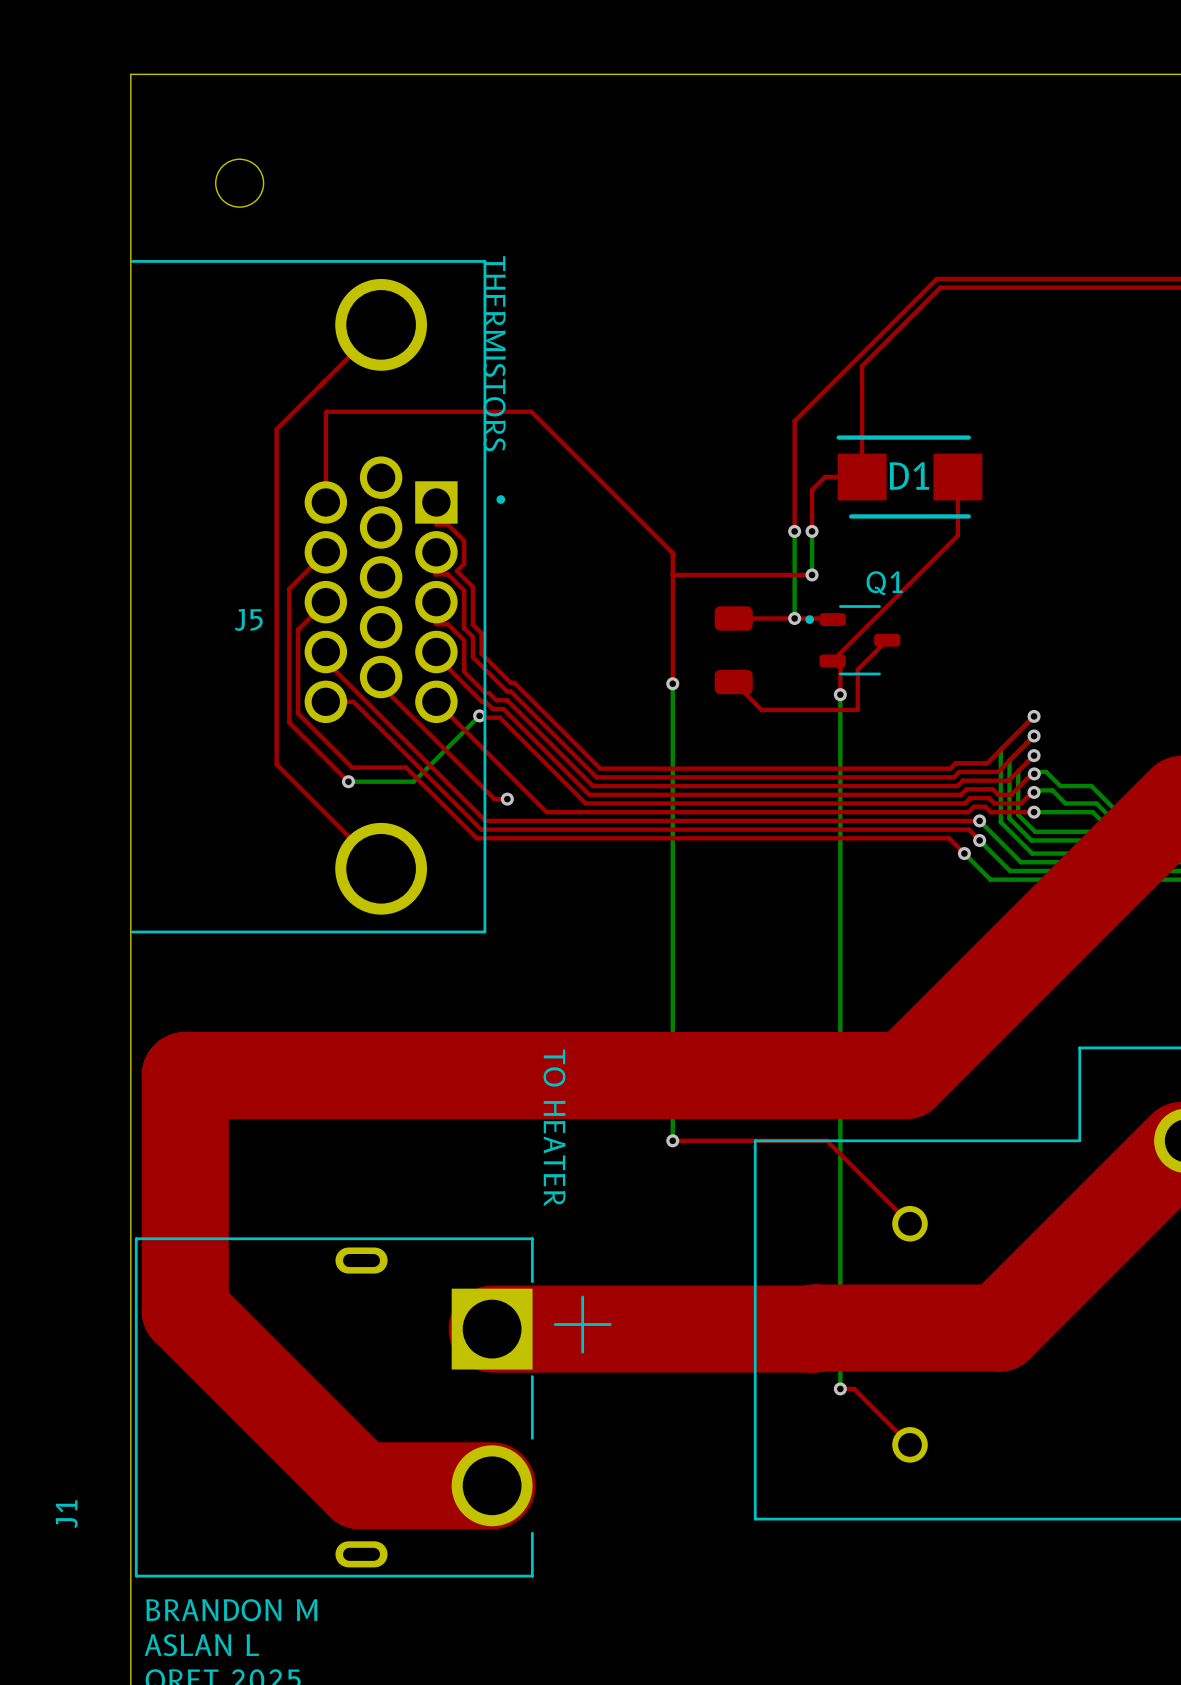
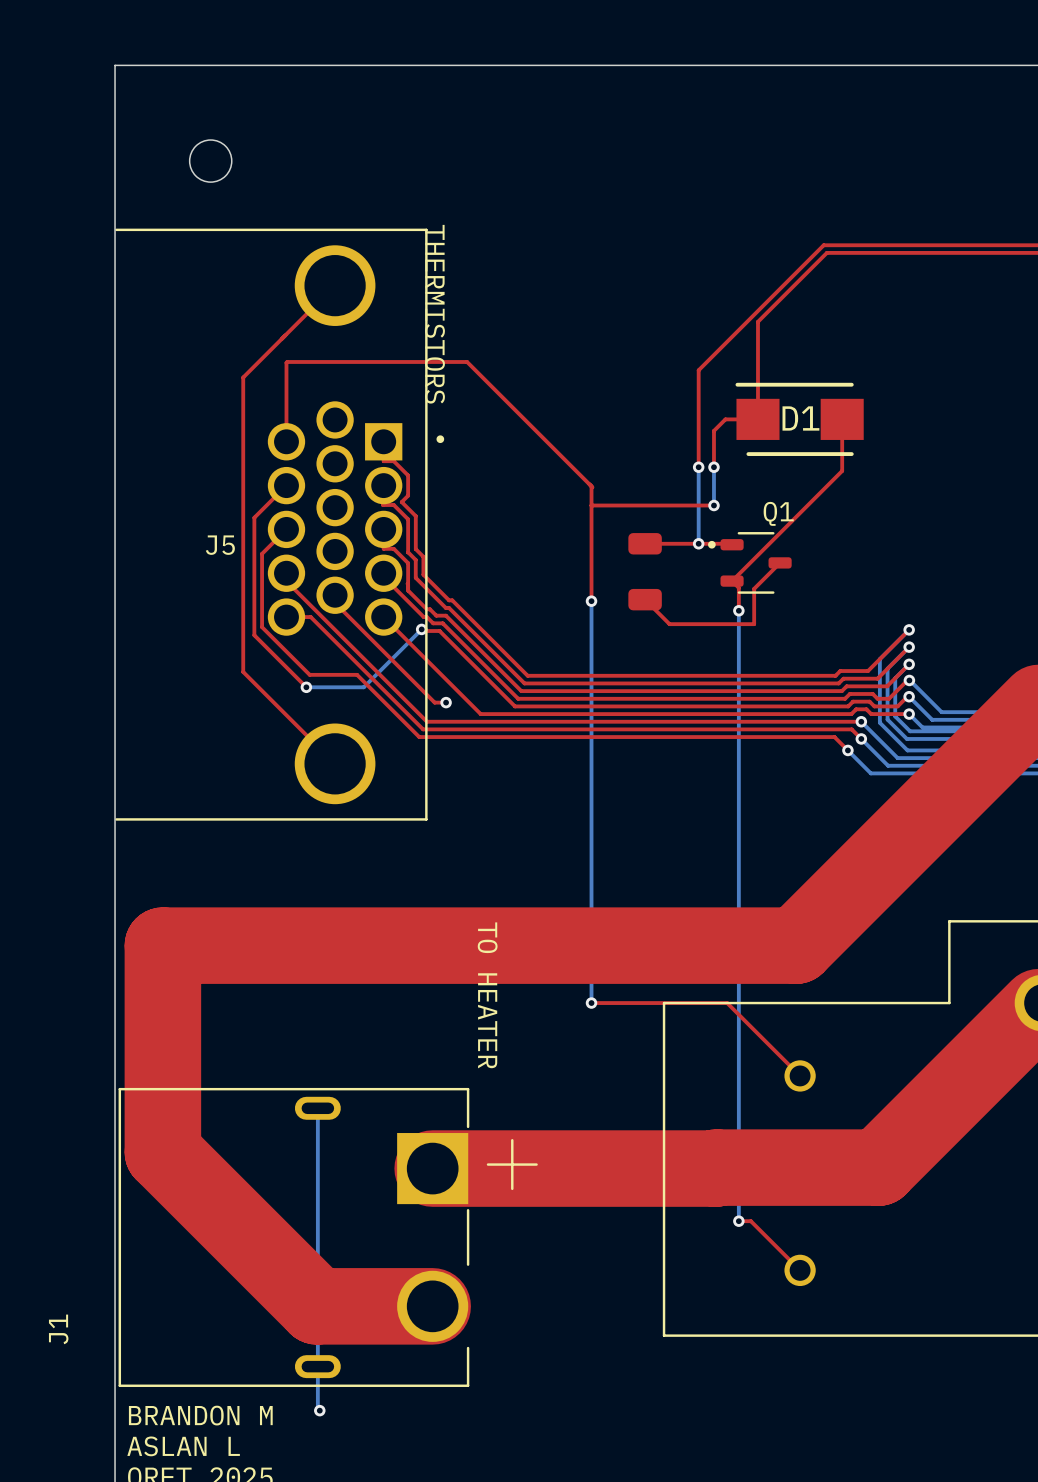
bottom track: (1036, 771) (1046, 771) (1060, 786) (1091, 786) (1115, 810) -> (911, 678) (911, 681) (941, 712) (980, 712)
bottom track: (1034, 792) (1036, 790) (1052, 790) (1065, 803) (1096, 803) (1111, 818) -> (909, 696) (932, 719) (977, 719)
bottom track: (1034, 812) (1092, 812) (1108, 827) -> (909, 714) (922, 727) (974, 727)
bottom track: none -> (317, 1108) (317, 1408) (319, 1410)
via: none -> (319, 1410)

